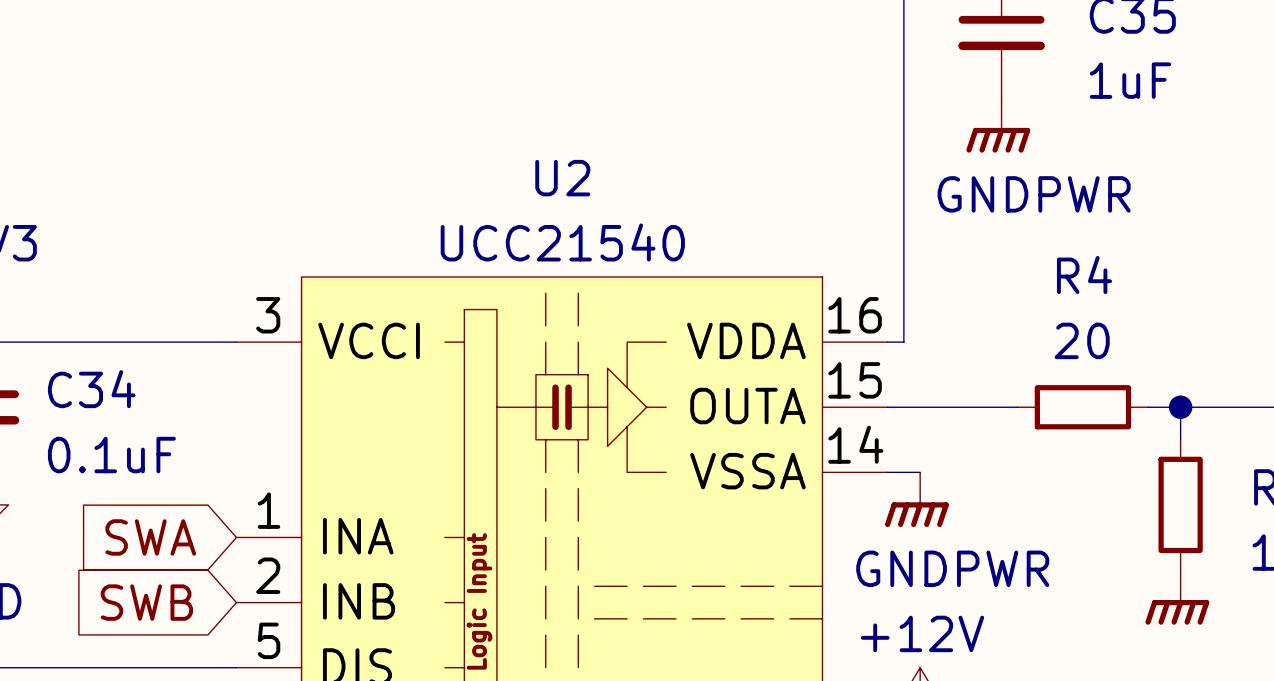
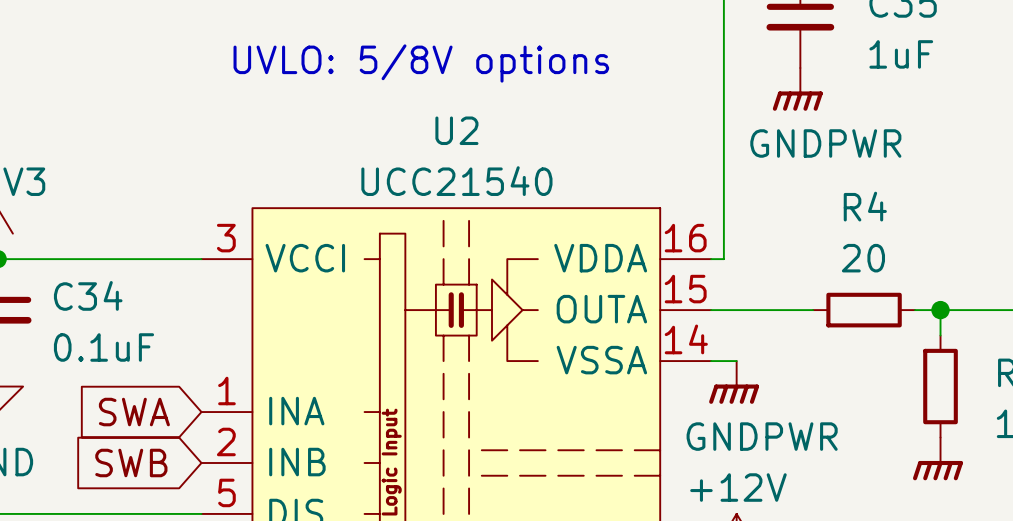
text: none -> UVLO: 5/8V options (421, 63)

